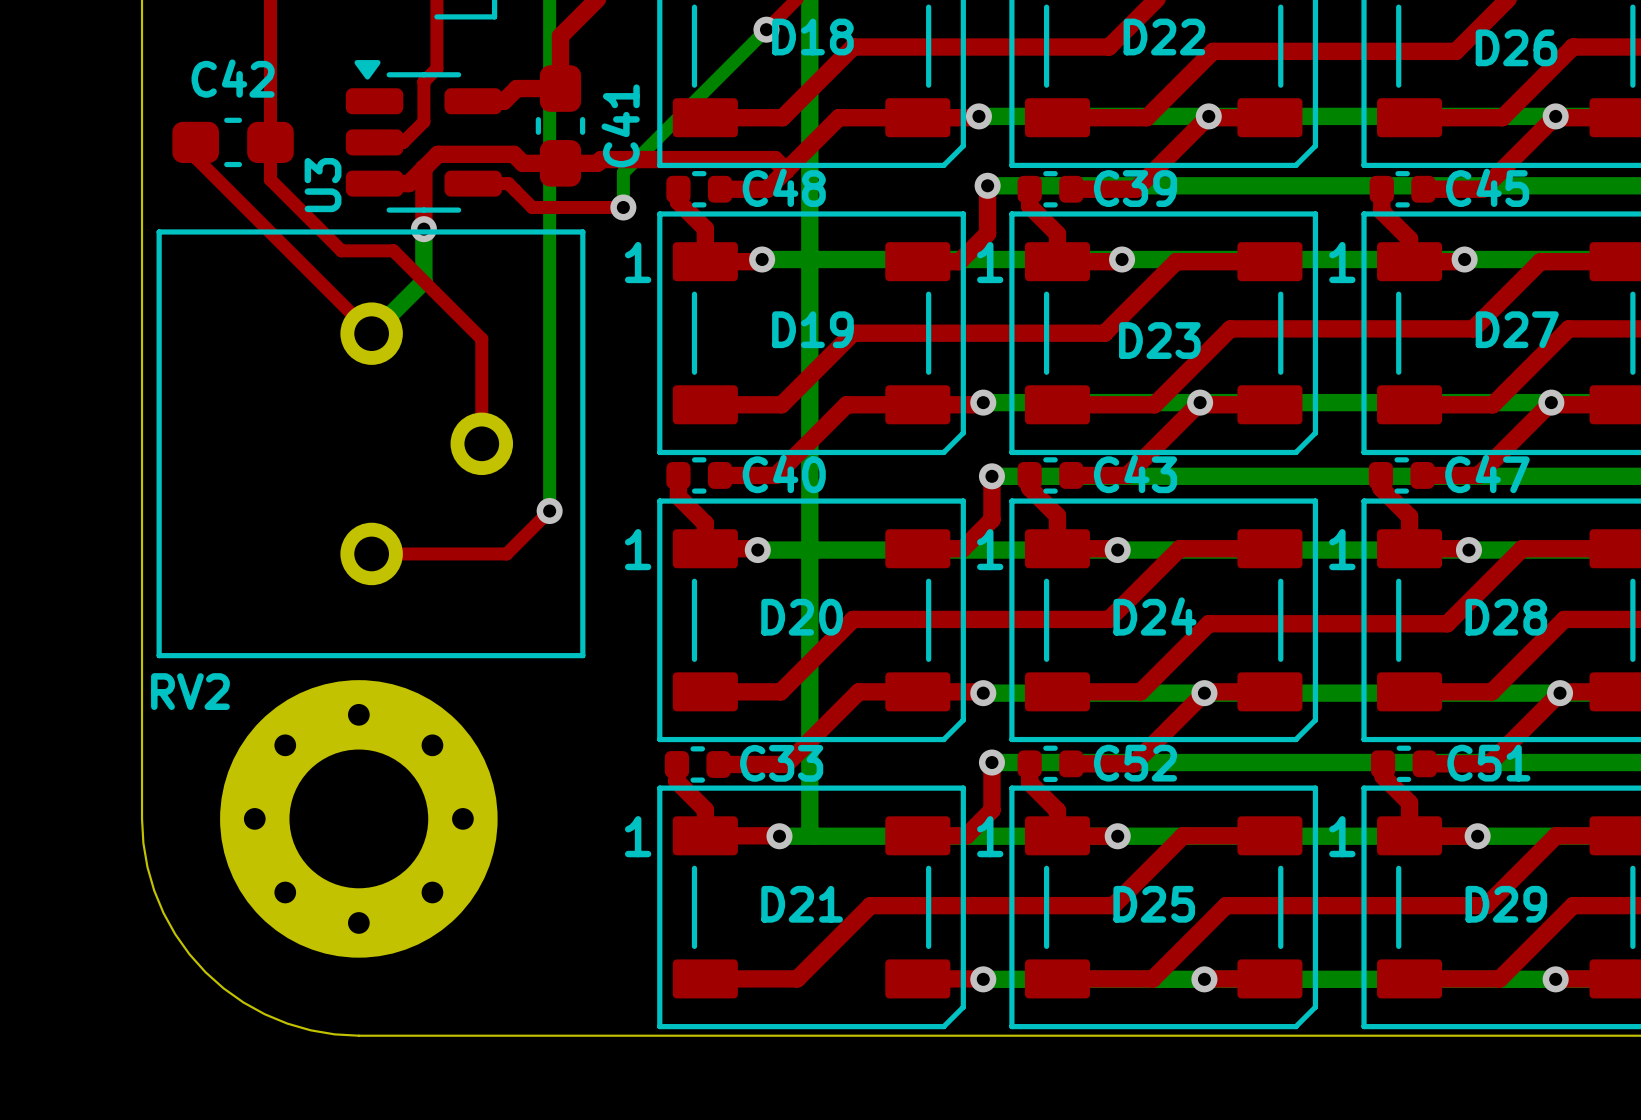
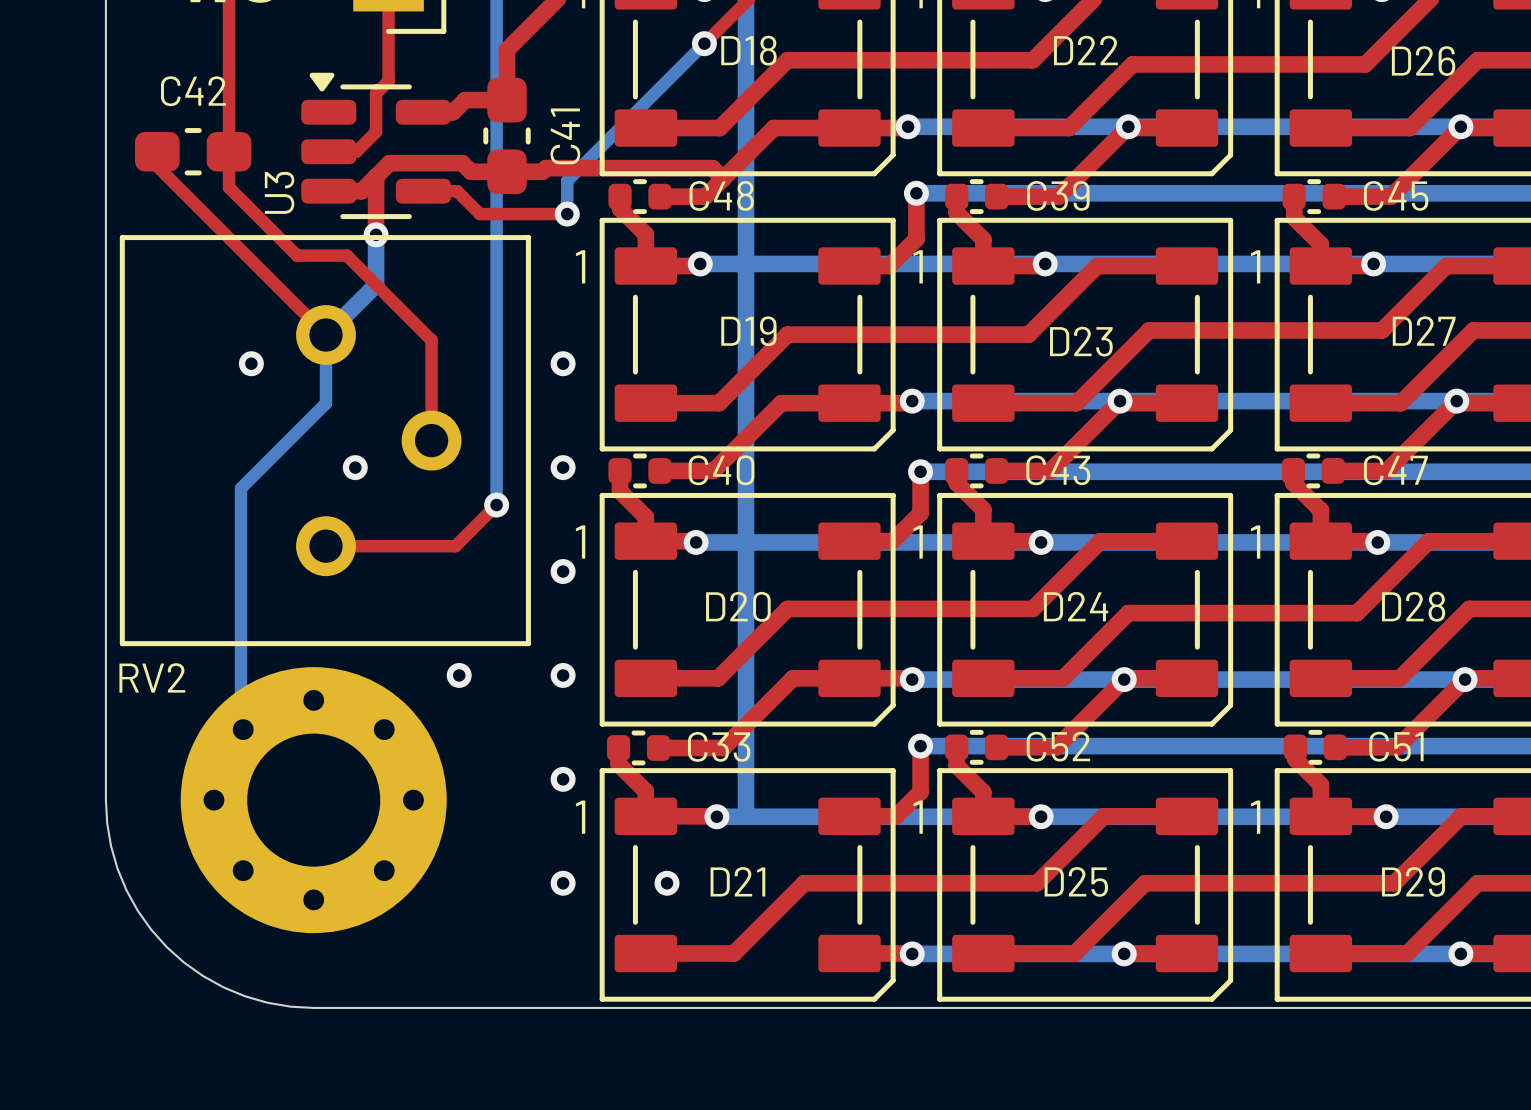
bottom track: none -> (325, 335) (325, 403) (240, 488) (240, 727) (313, 800)
via: none -> (251, 363)
via: none -> (563, 363)
via: none -> (355, 467)
via: none -> (563, 467)
via: none -> (563, 571)
via: none -> (459, 675)
via: none -> (563, 675)
via: none -> (563, 779)
via: none -> (563, 883)
via: none -> (667, 883)

